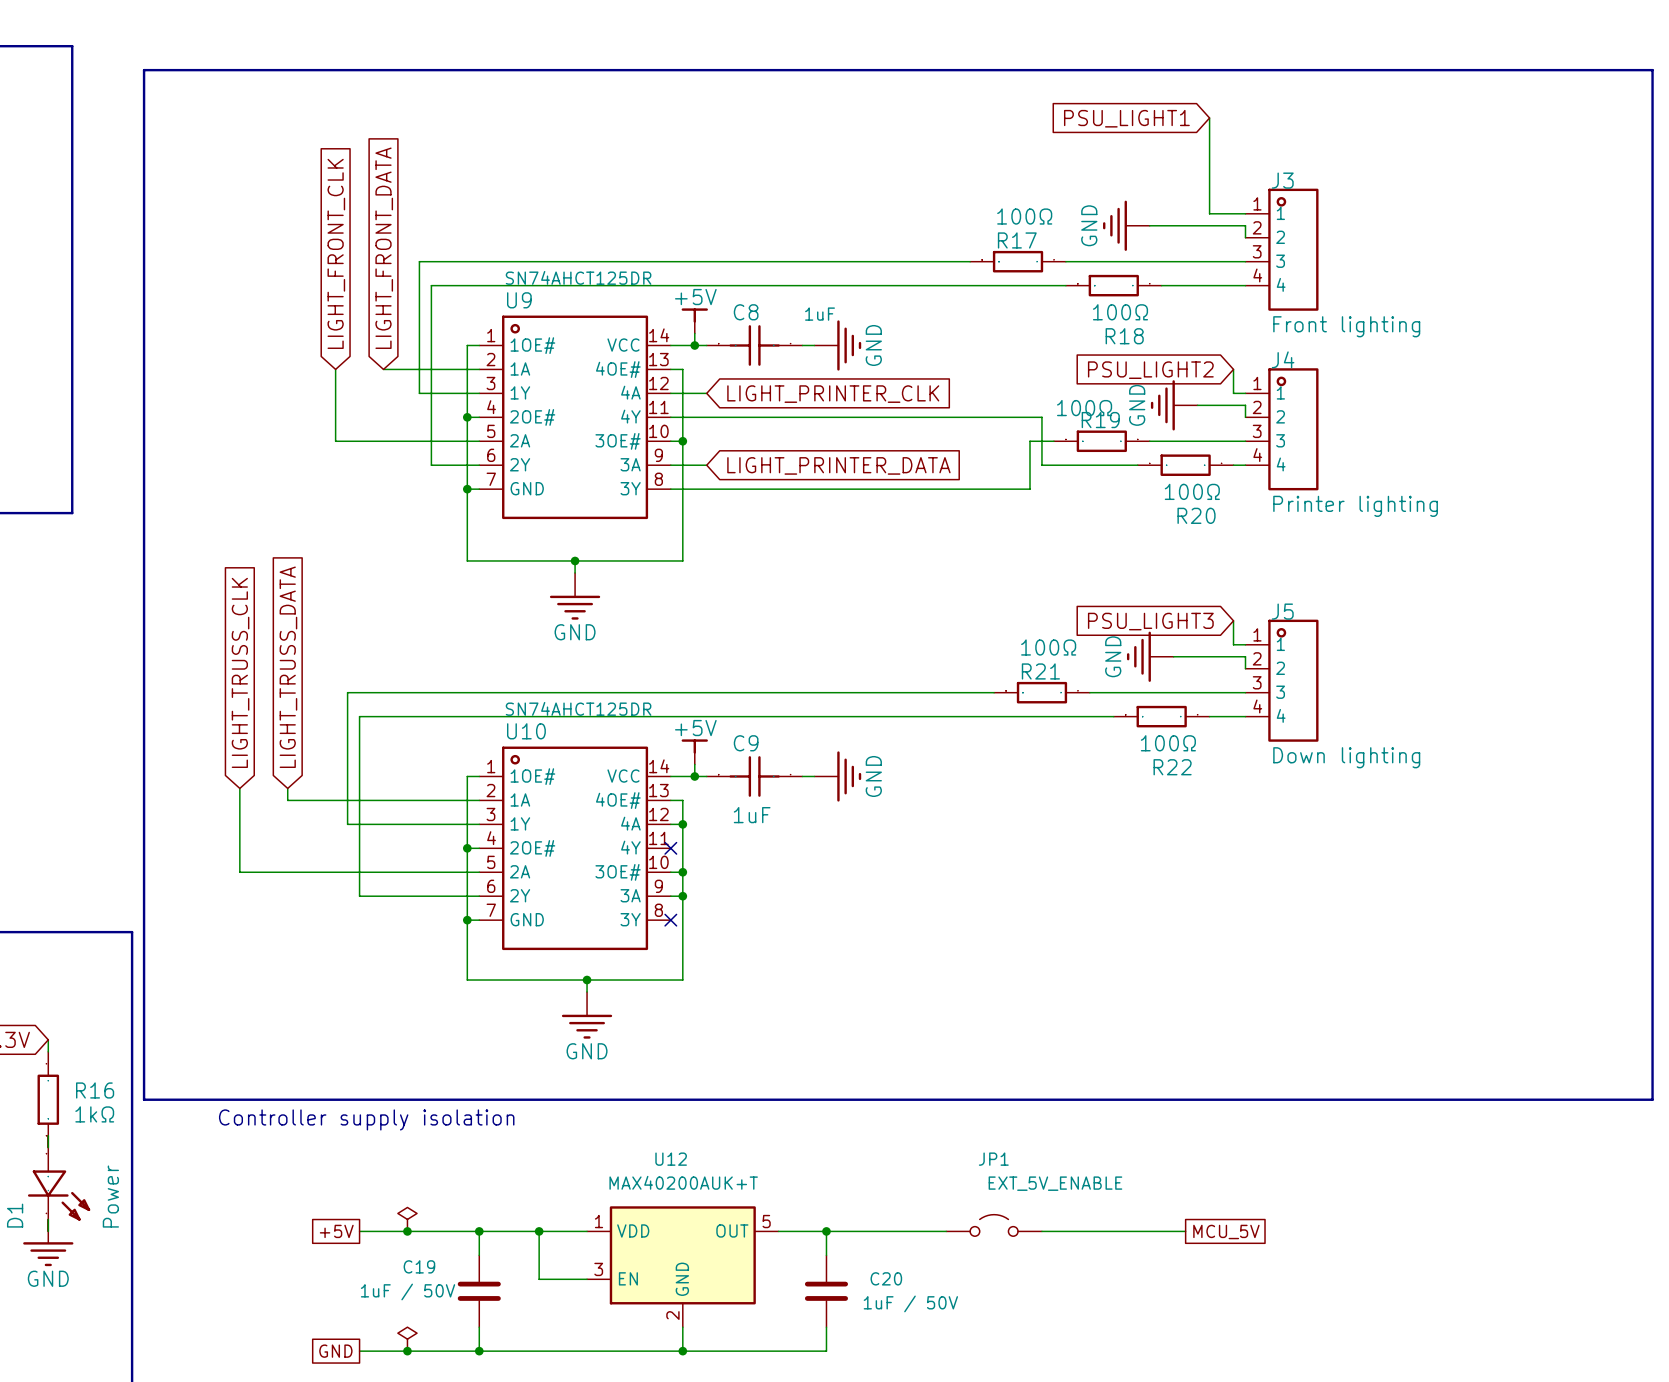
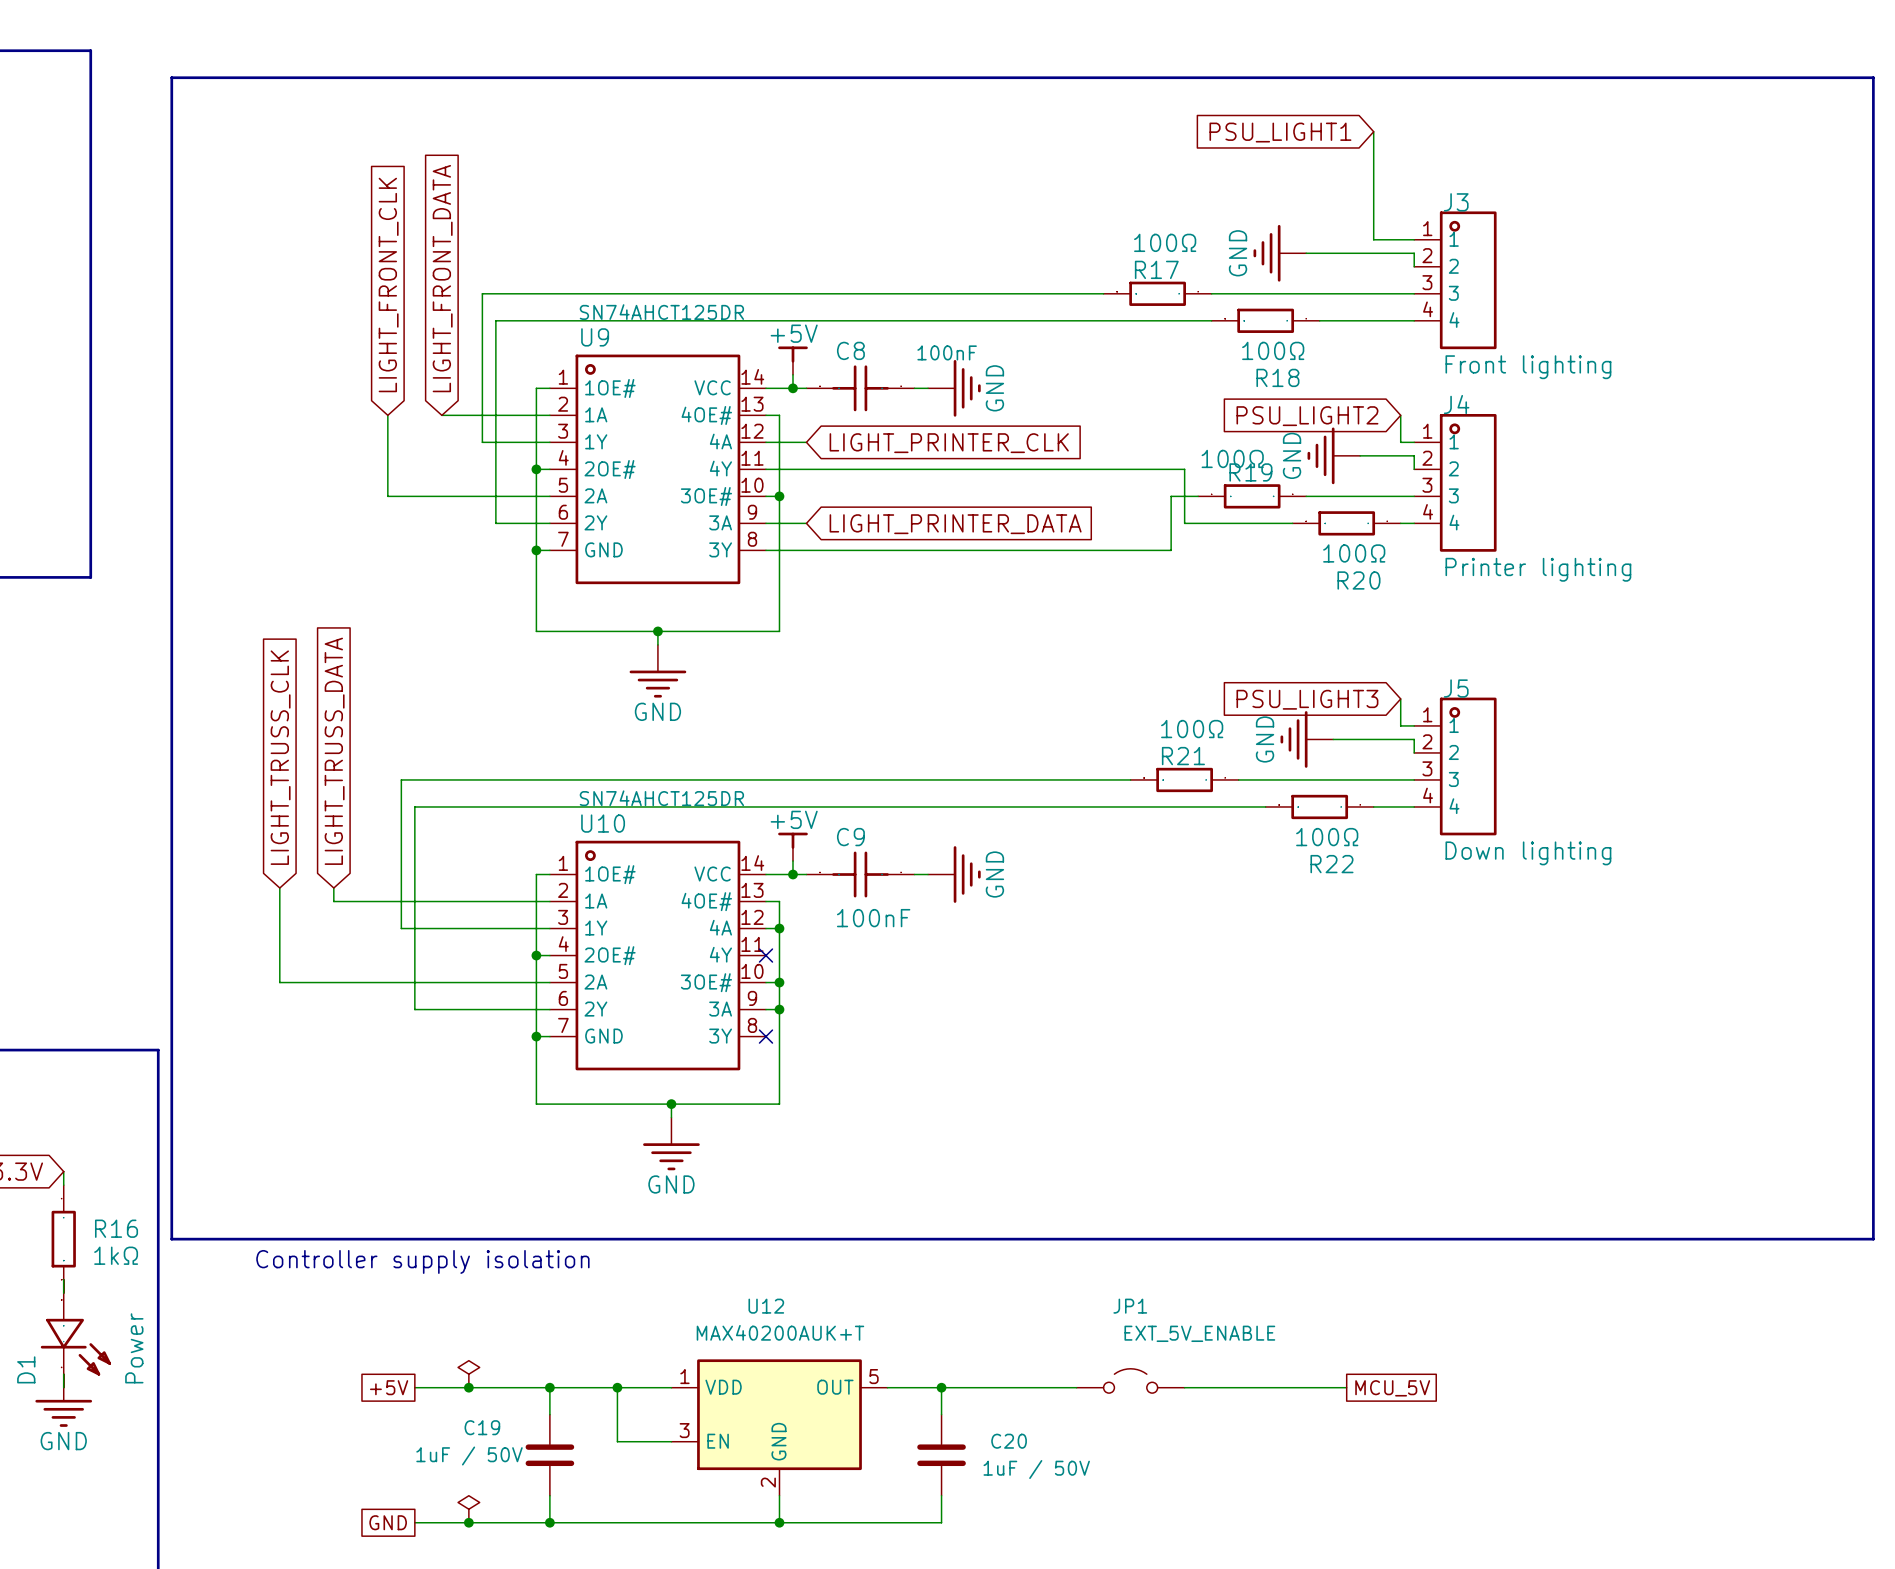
C8 value: 1uF (820, 314) -> 100nF (947, 352)
C9 value: 1uF (752, 815) -> 100nF (873, 918)

